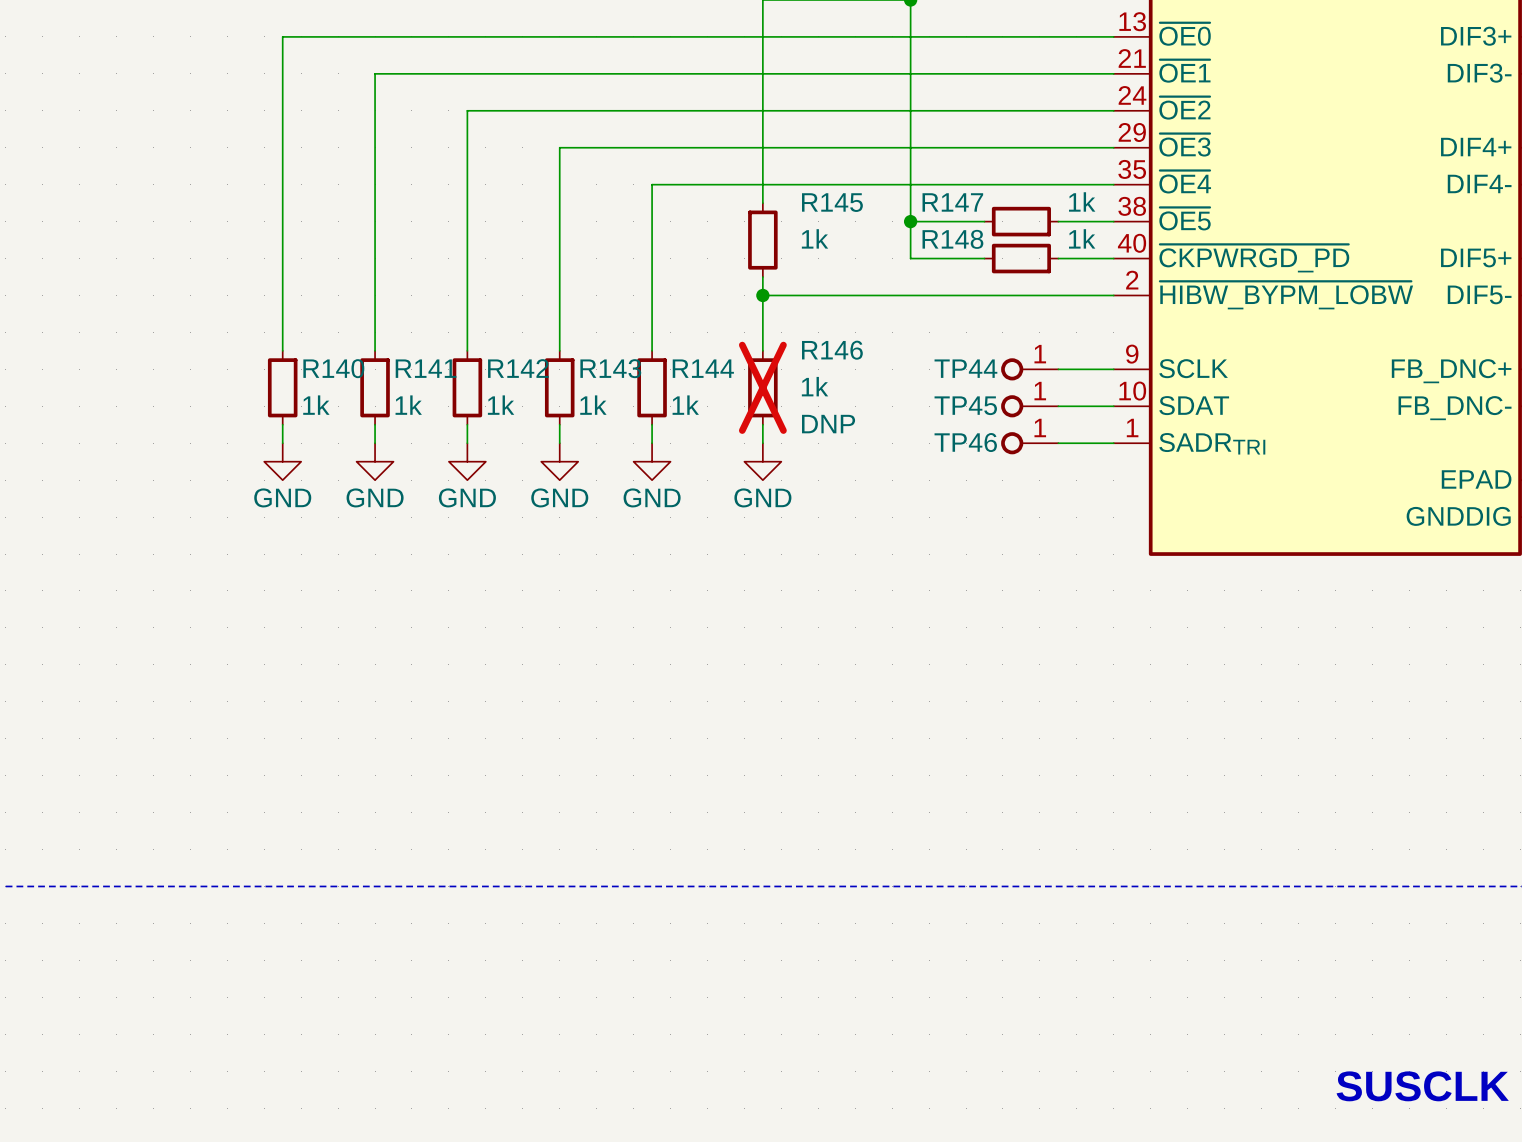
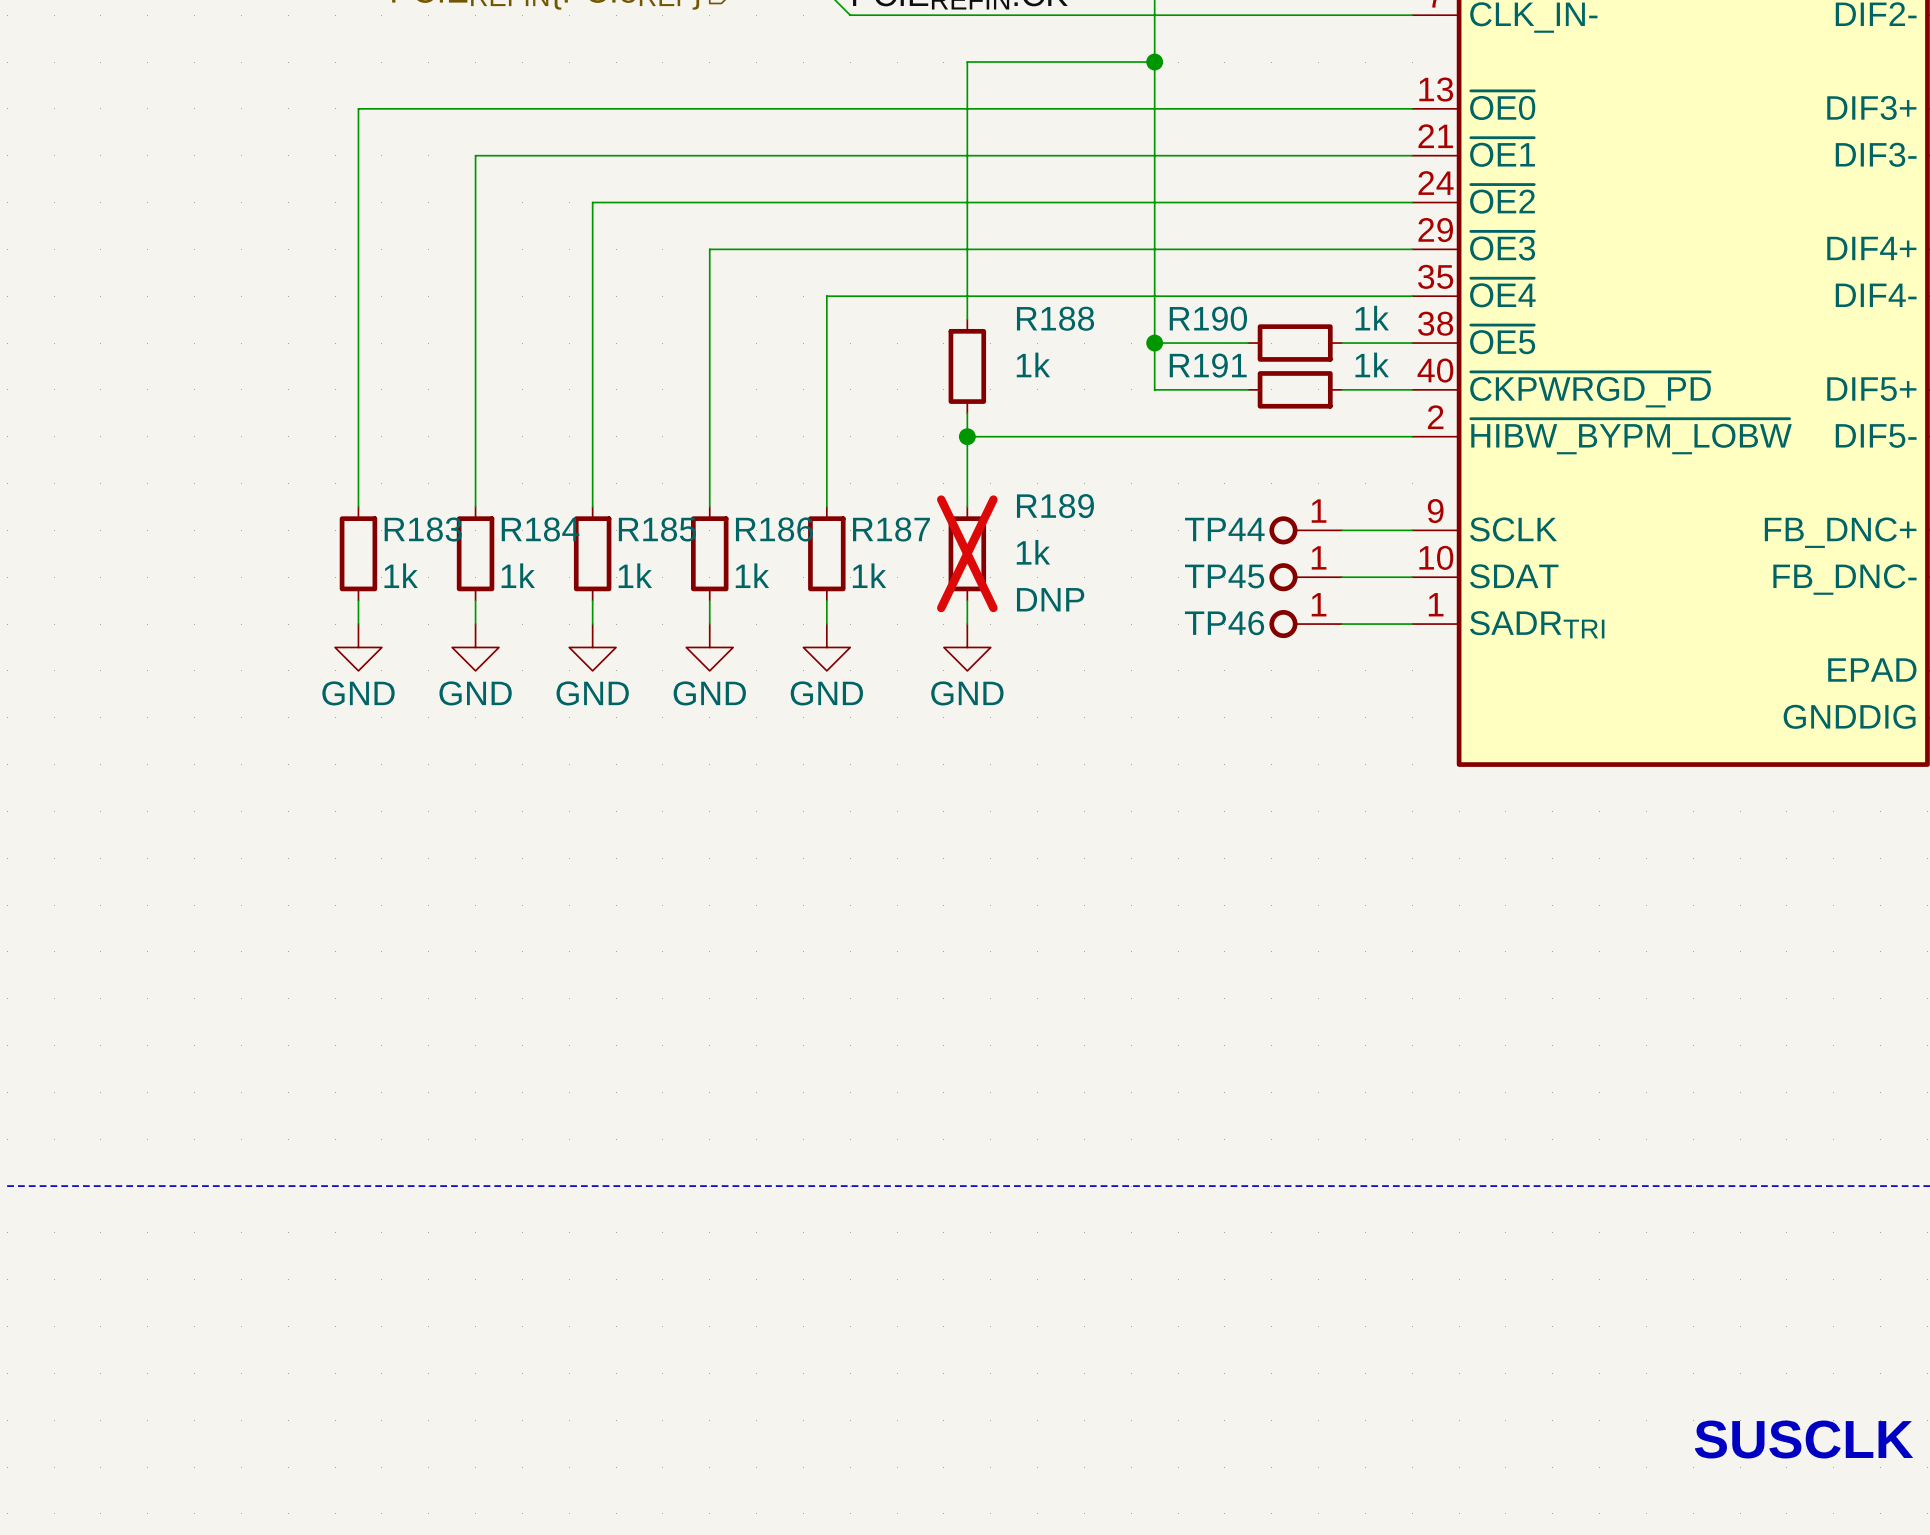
R145 name: R145 (832, 202) -> R188 (1055, 318)
R147 name: R147 (952, 202) -> R190 (1208, 318)
R148 name: R148 (952, 239) -> R191 (1208, 365)
R146 name: R146 (832, 350) -> R189 (1055, 506)
R140 name: R140 (333, 368) -> R183 (423, 529)
R141 name: R141 (426, 368) -> R184 (540, 529)
R142 name: R142 (518, 368) -> R185 (657, 529)
R143 name: R143 (610, 368) -> R186 (774, 529)
R144 name: R144 (703, 368) -> R187 (891, 529)

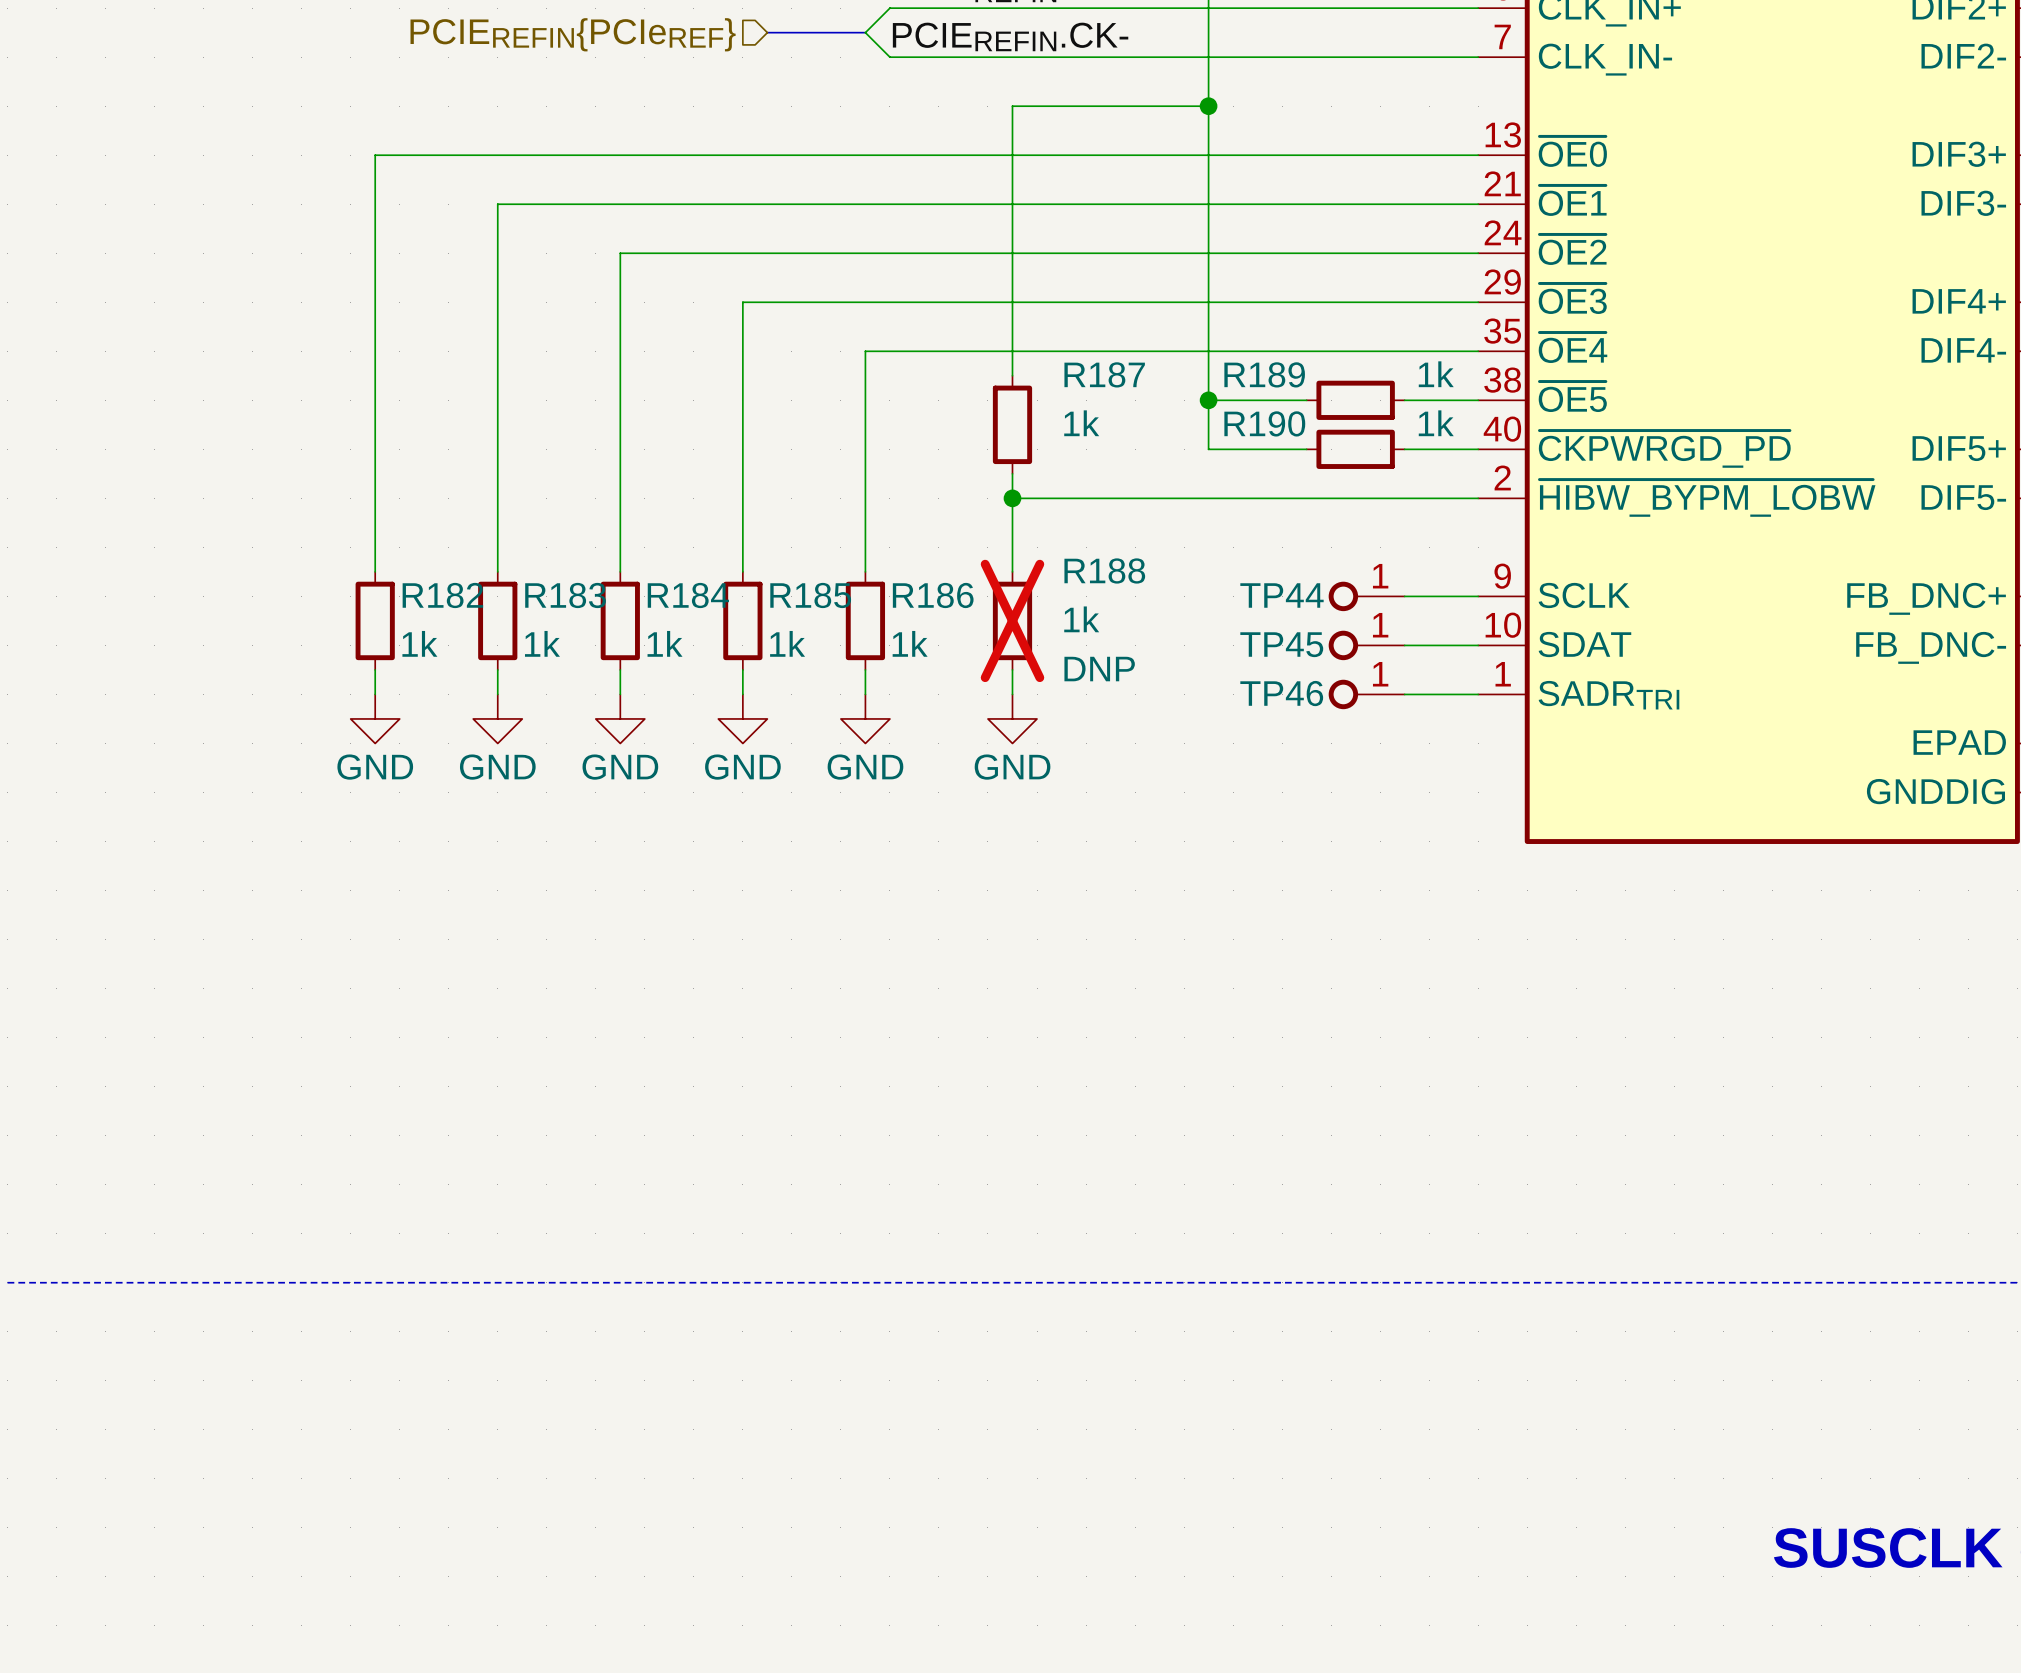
R188 name: R188 (1055, 318) -> R187 (1104, 374)
R190 name: R190 (1208, 318) -> R189 (1264, 374)
R191 name: R191 (1208, 365) -> R190 (1264, 423)
R189 name: R189 (1055, 506) -> R188 (1104, 570)
R183 name: R183 (423, 529) -> R182 (442, 595)
R184 name: R184 (540, 529) -> R183 (565, 595)
R185 name: R185 (657, 529) -> R184 (688, 595)
R186 name: R186 (774, 529) -> R185 (810, 595)
R187 name: R187 (891, 529) -> R186 (933, 595)

